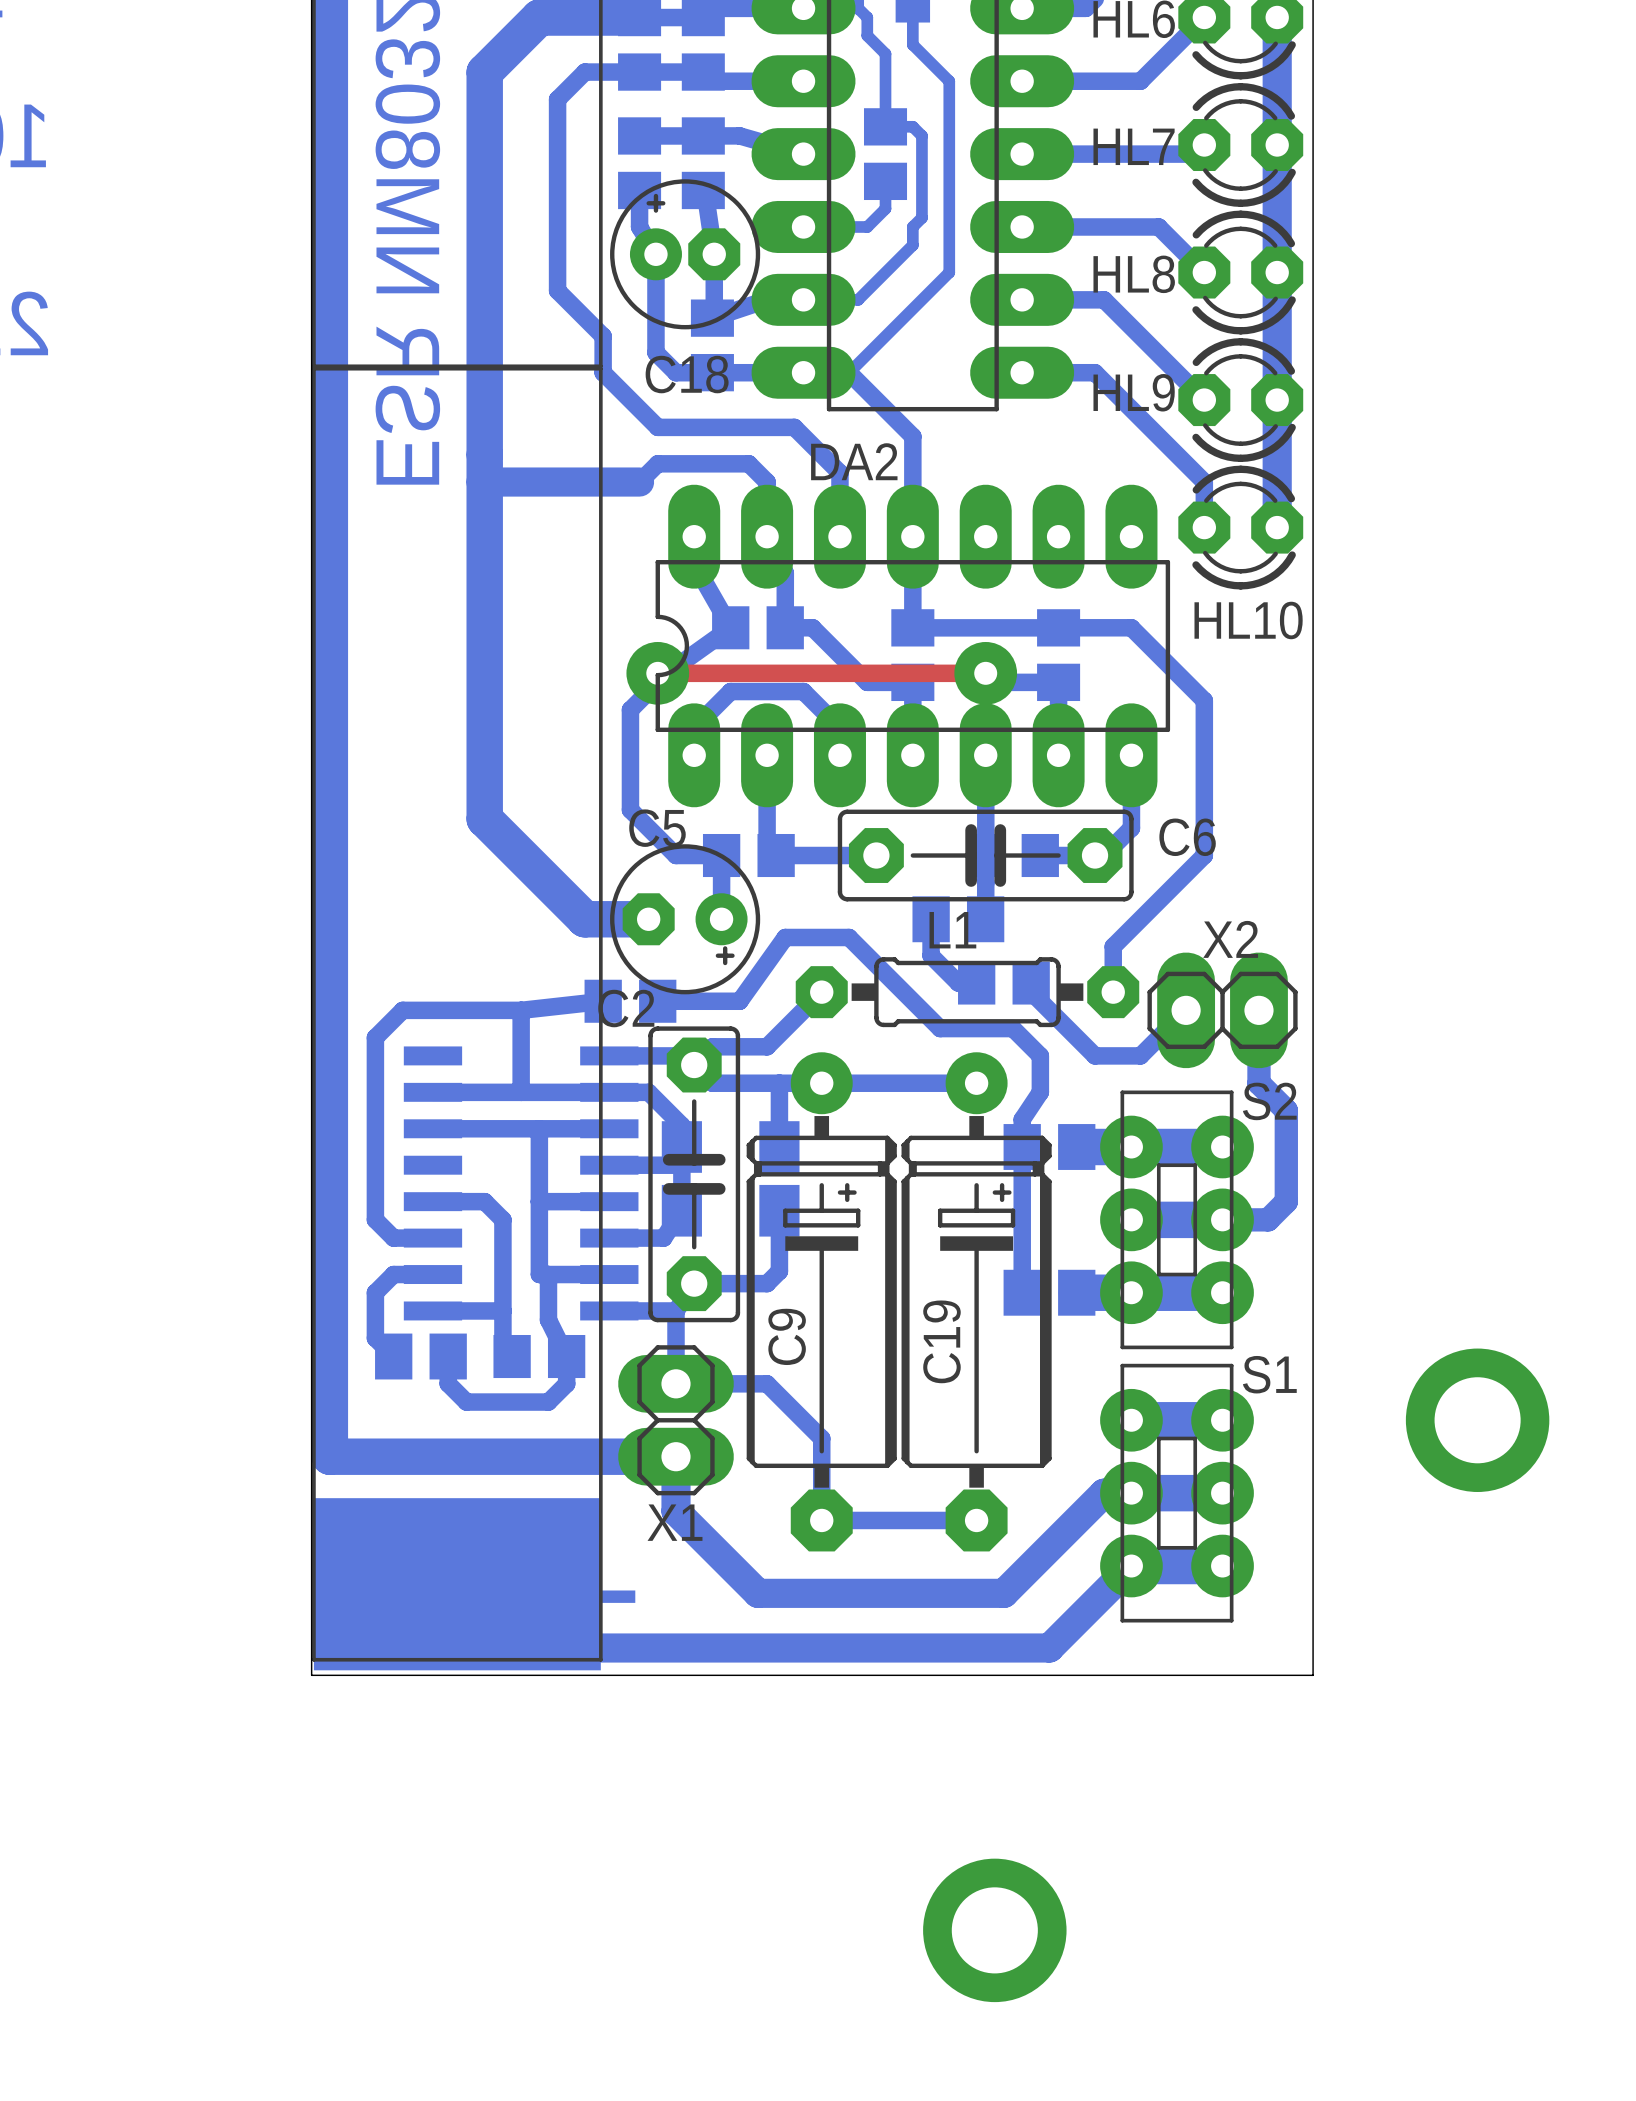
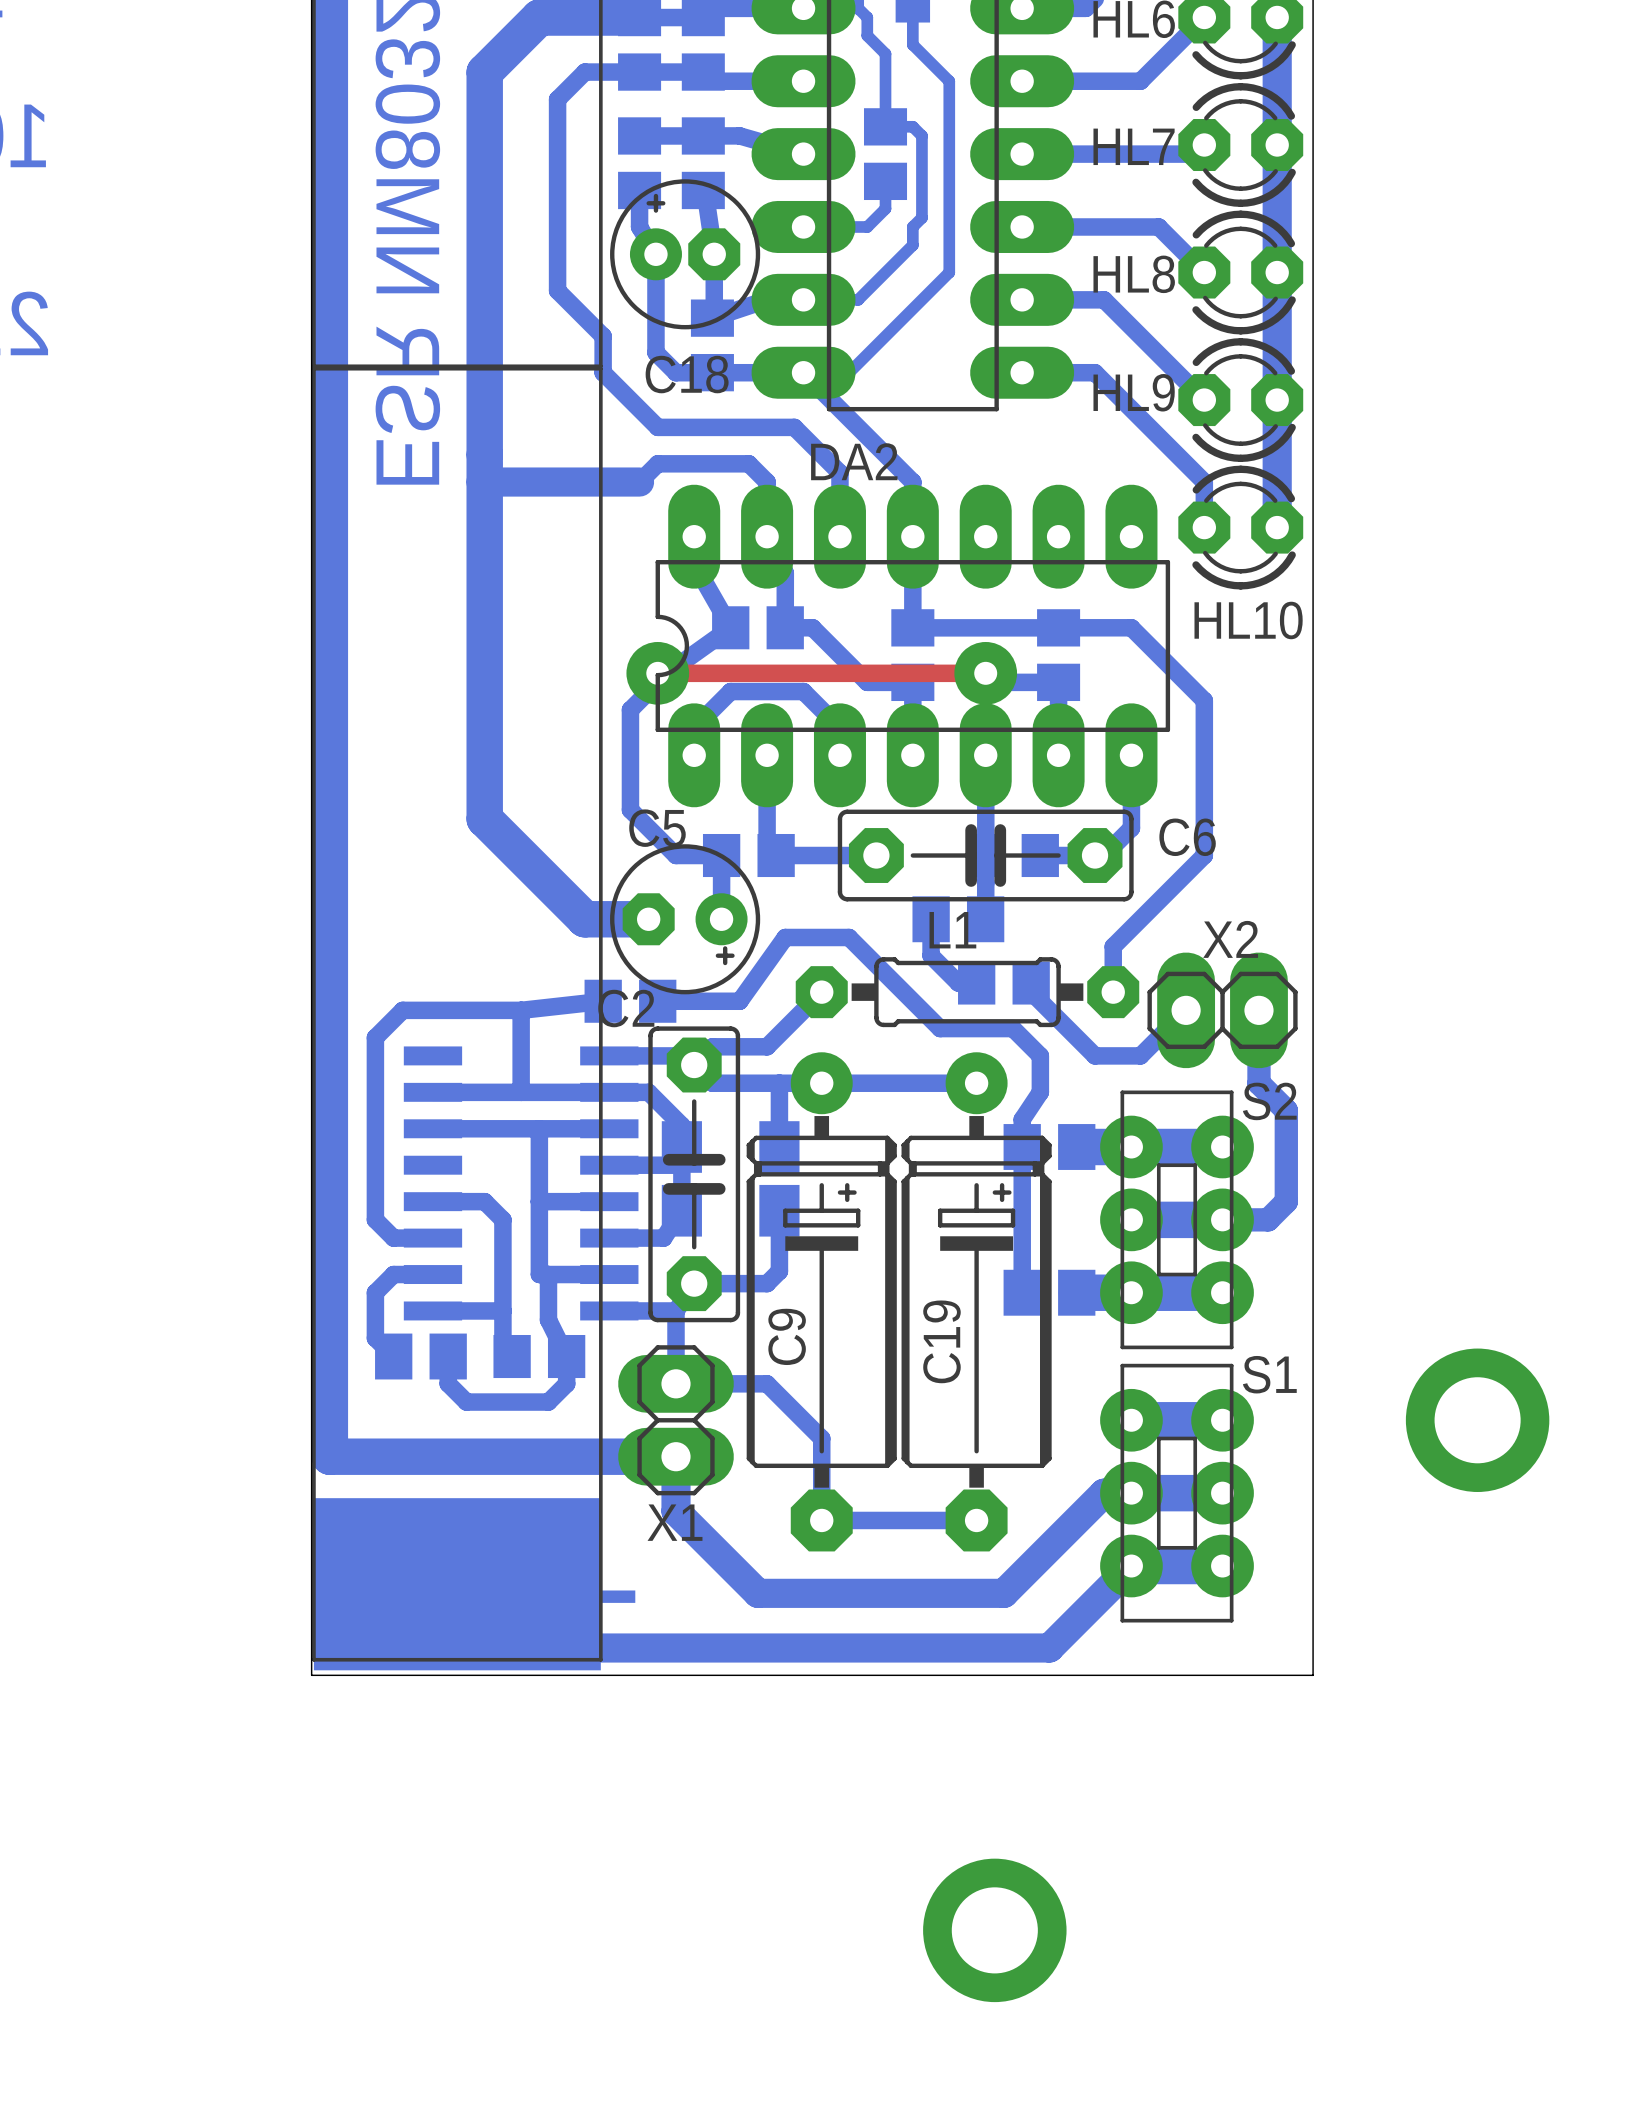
bottom track: (849, 372) (912, 436) (912, 482) -> (803, 372) (912, 482)

